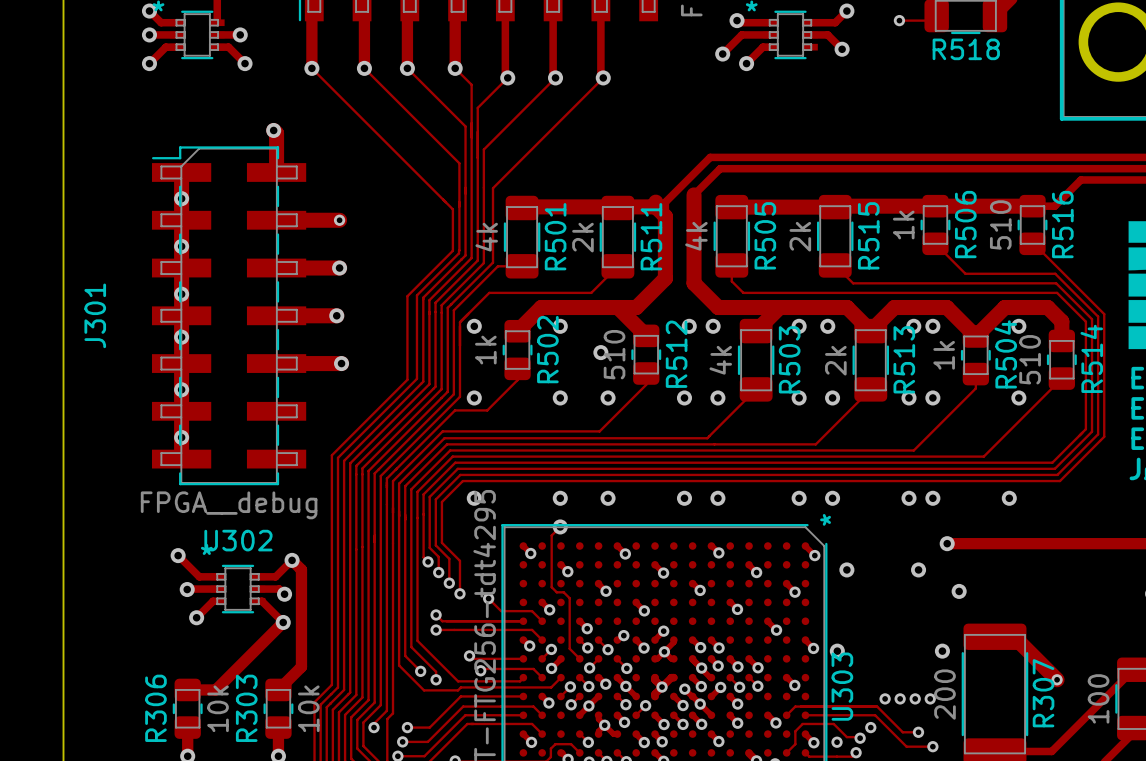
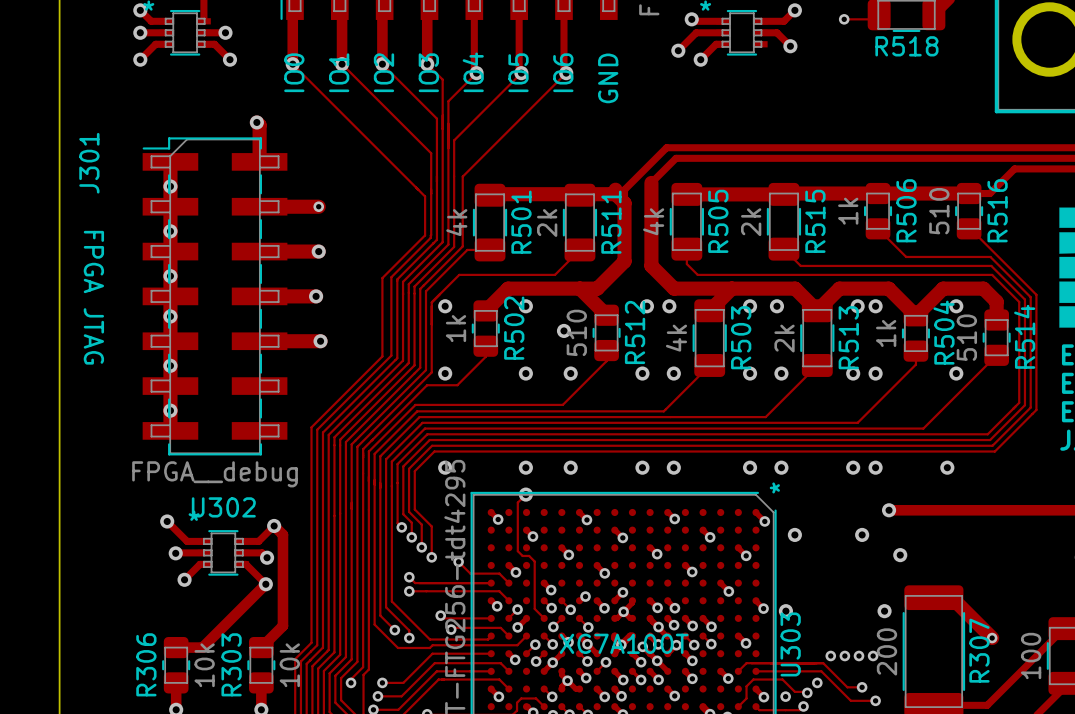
text: none -> IO0 (294, 72)
text: none -> IO1 (339, 72)
text: none -> IO2 (383, 72)
text: none -> IO3 (428, 72)
text: none -> IO4 (473, 72)
text: none -> IO5 (518, 72)
text: none -> IO6 (563, 72)
text: none -> GND (608, 78)
J301 name position: J301 (95, 315) -> J301 (89, 163)
text: none -> FPGA JTAG (93, 297)
text: none -> XC7A100T (624, 643)

